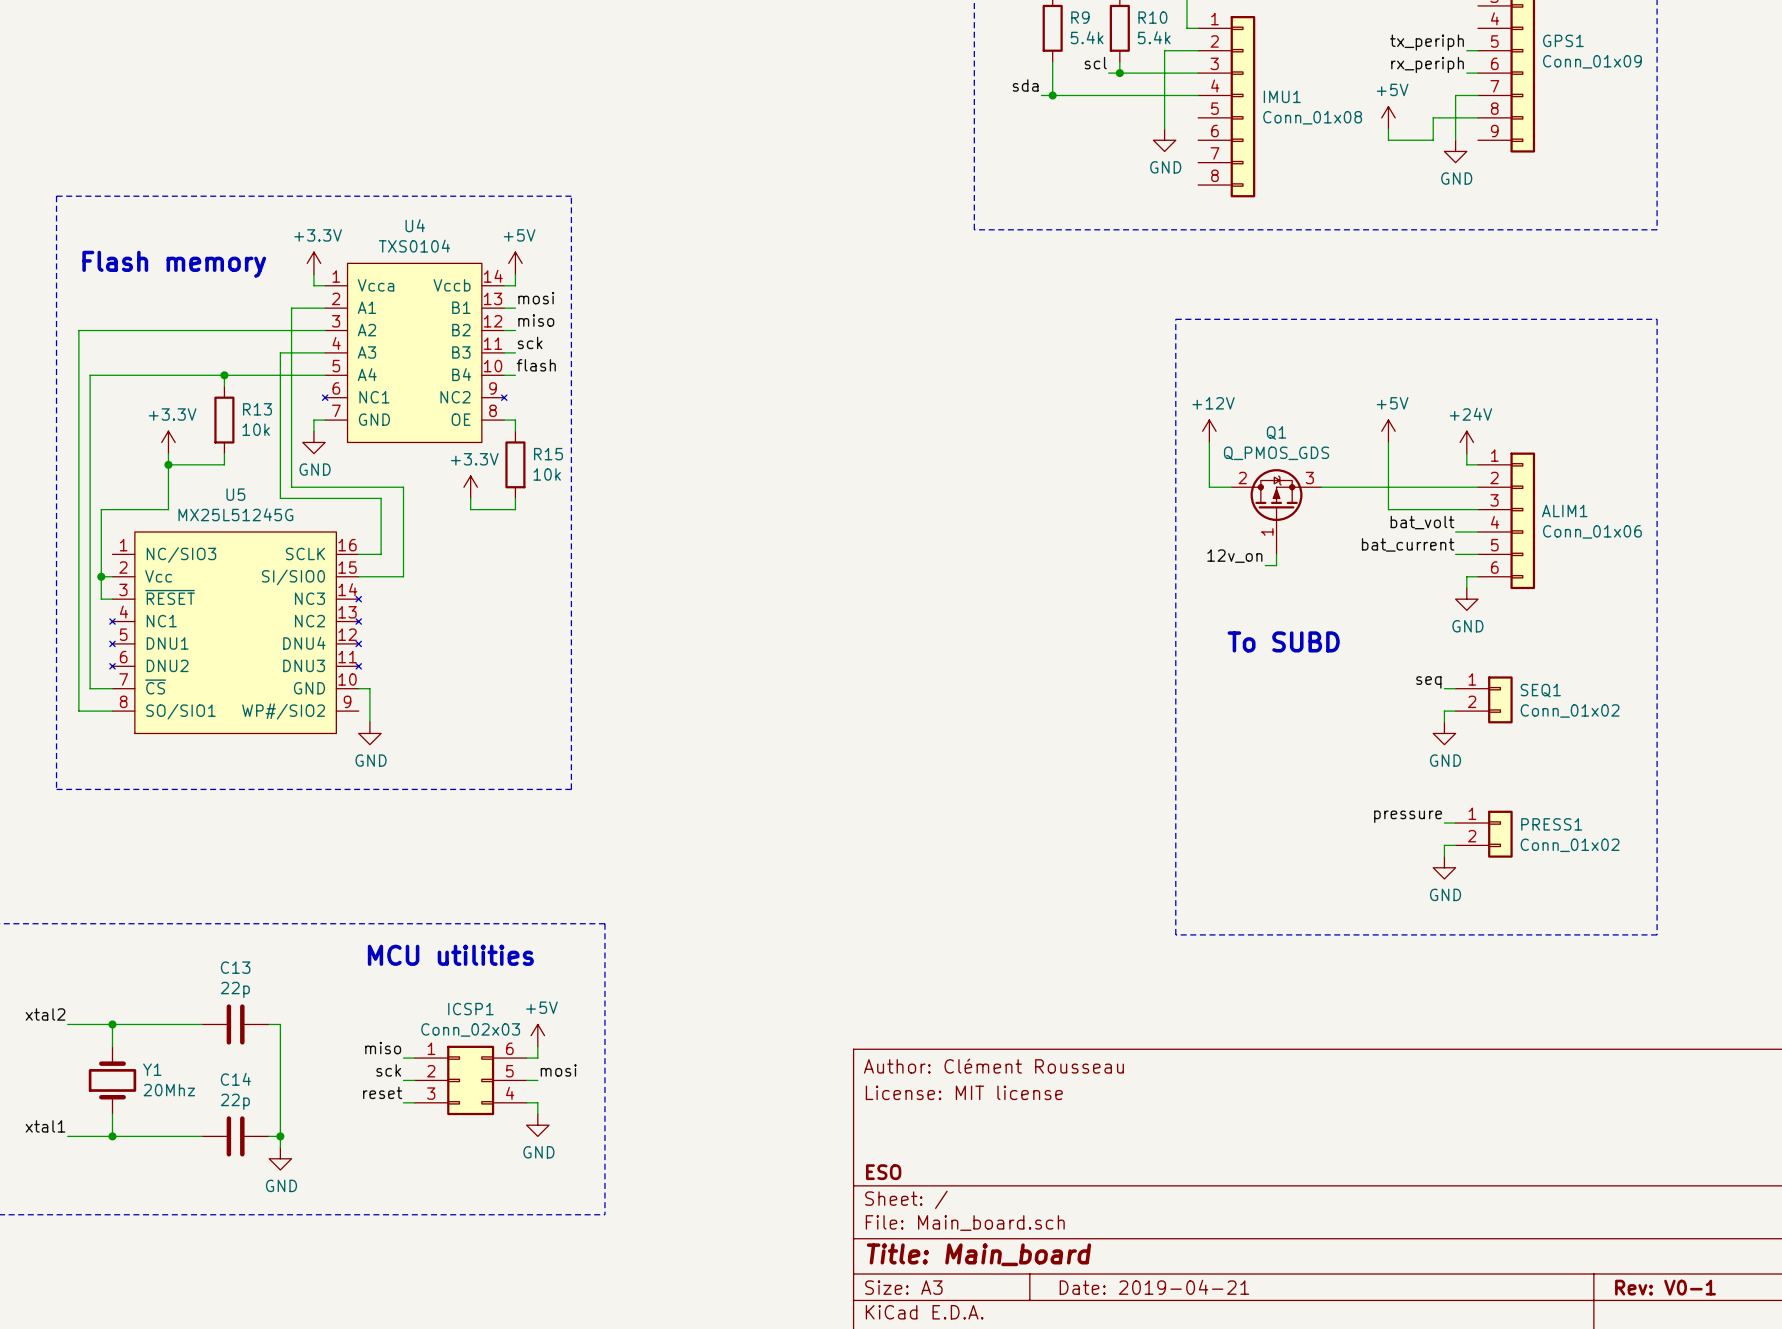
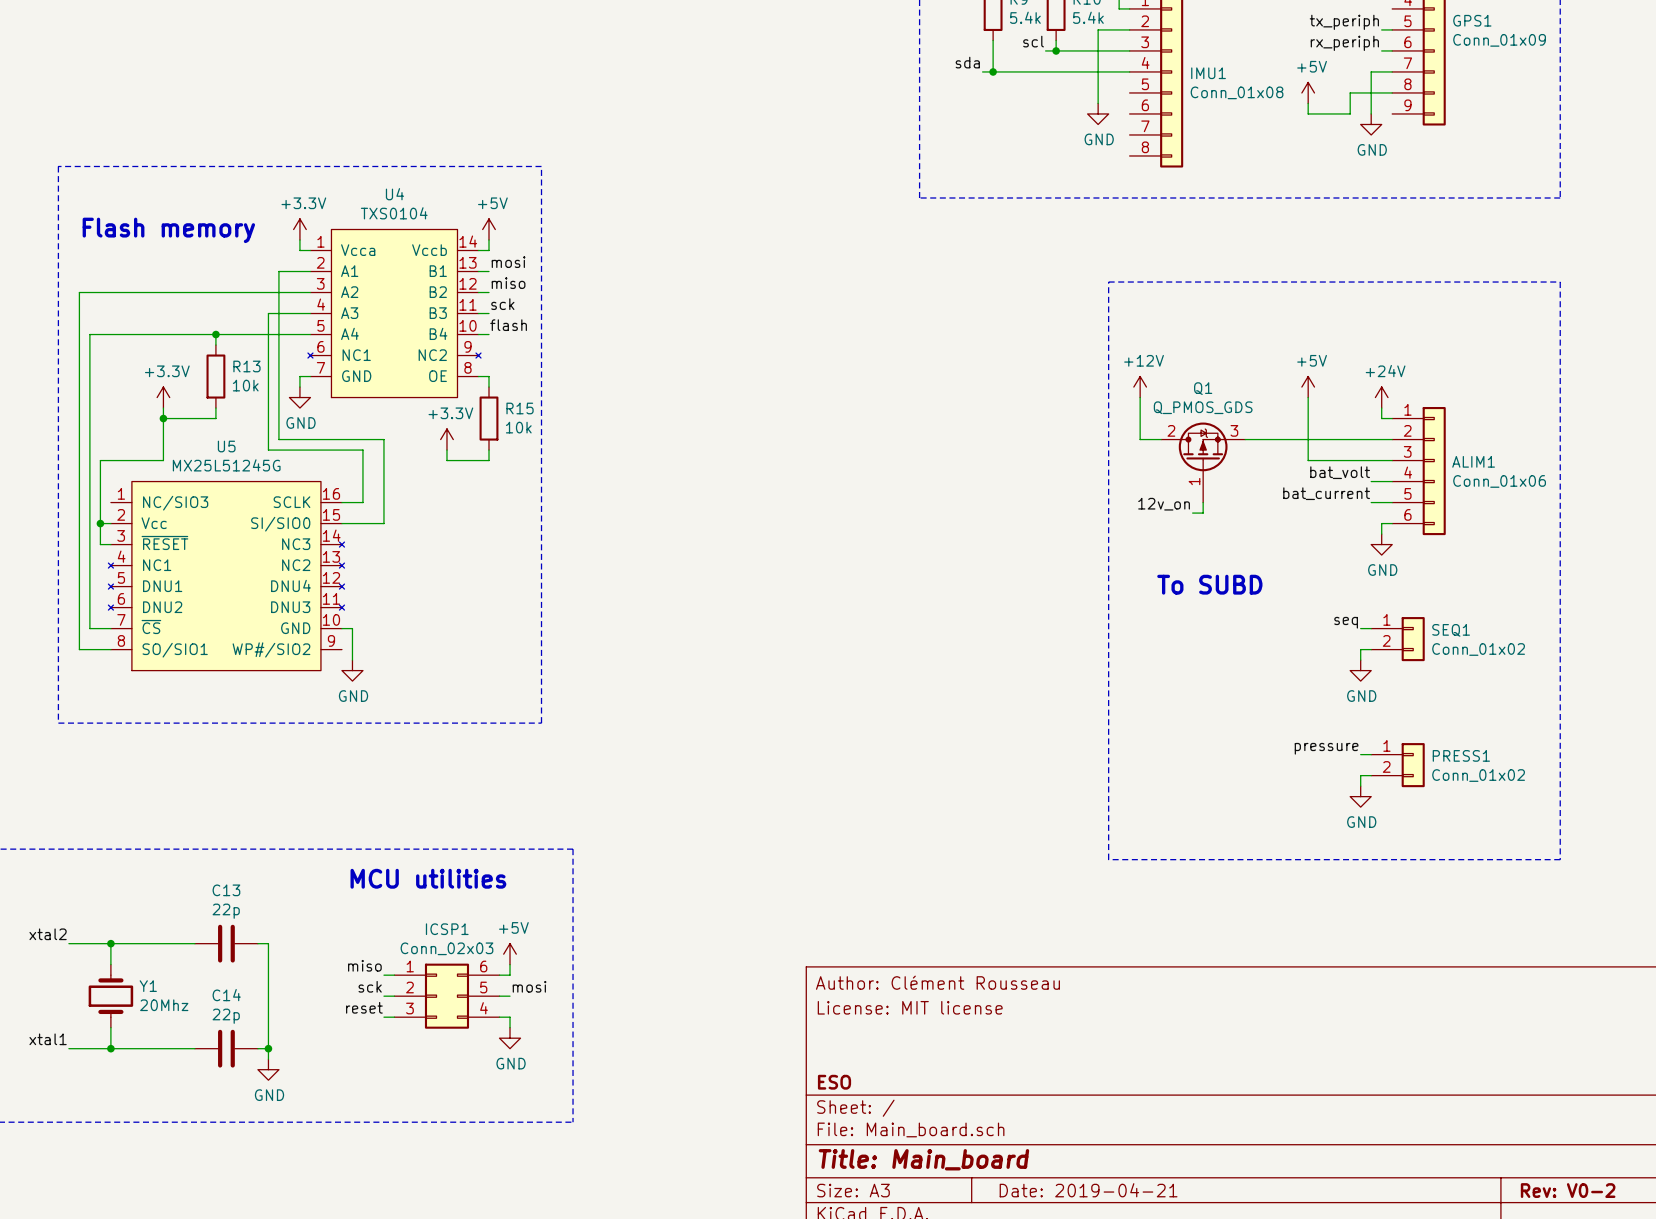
title block: Rev: V0-1 (1665, 1287) -> Rev: V0-2 (1568, 1190)

